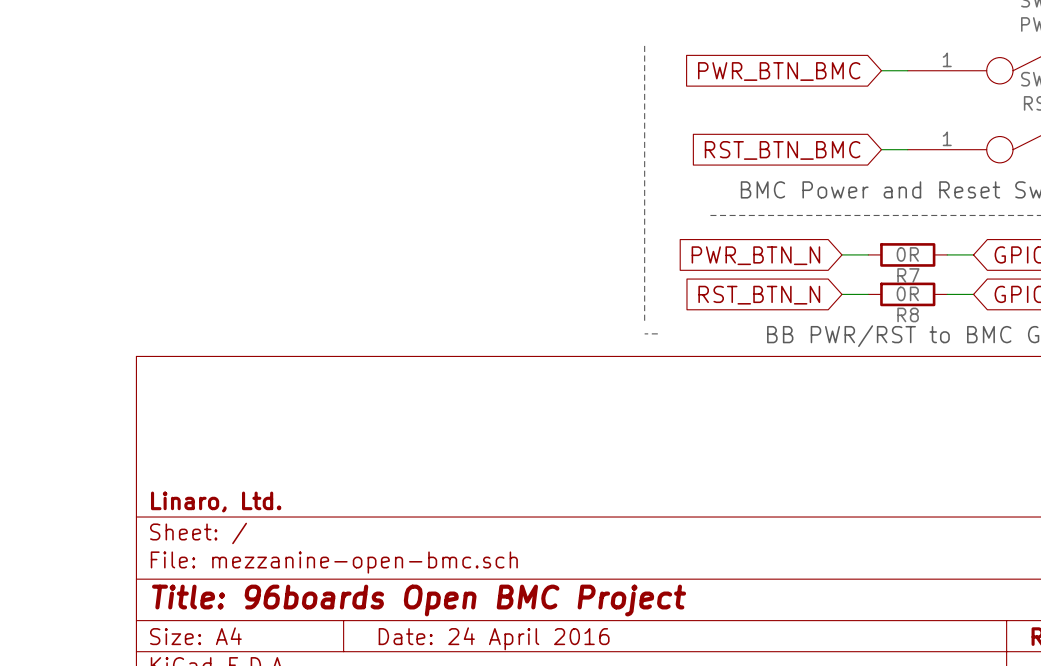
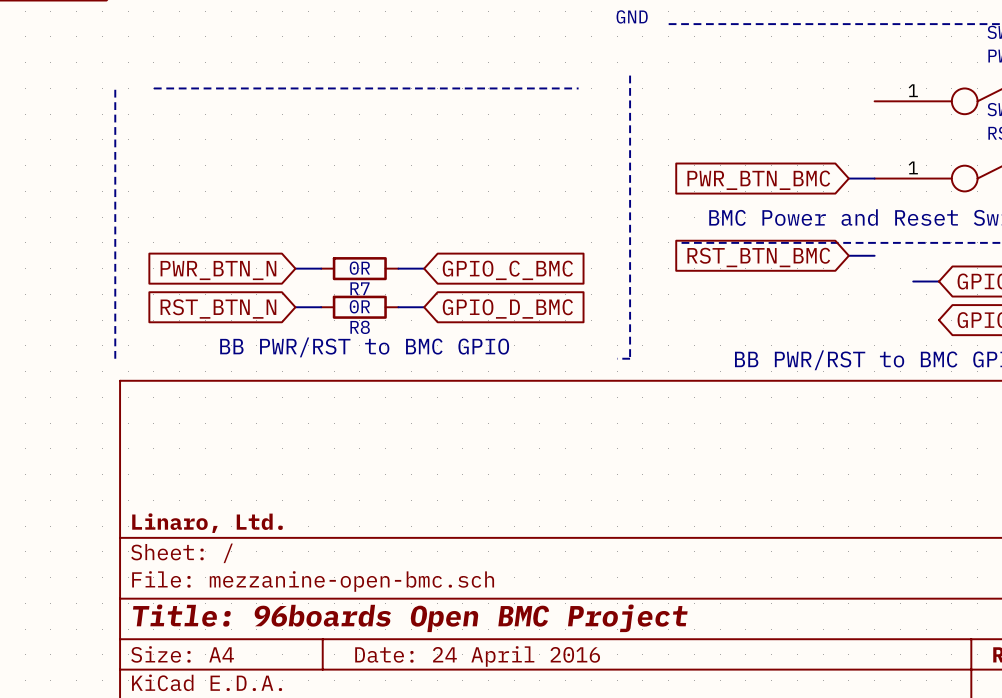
line: (644, 44) (644, 320) -> none
line: none -> (630, 75) (630, 358)
line: none -> (115, 88) (115, 358)
line: none -> (153, 88) (578, 88)
wire: (881, 70) (907, 70) -> none
global label: PWR_BTN_BMC (779, 71) -> none
global label: RST_BTN_BMC (782, 150) -> PWR_BTN_BMC (758, 180)
global label: none -> RST_BTN_BMC (758, 257)
wire: none -> (295, 268) (321, 268)
wire: none -> (398, 268) (424, 268)
global label: none -> PWR_BTN_N (218, 270)
global label: none -> GPIO_C_BMC (507, 270)
wire: (841, 254) (868, 254) -> (848, 255) (874, 255)
R7 position: (907, 254) -> (359, 268)
global label: PWR_BTN_N (755, 255) -> none
wire: none -> (295, 307) (321, 307)
wire: none -> (398, 307) (424, 307)
global label: none -> RST_BTN_N (218, 308)
global label: none -> GPIO_D_BMC (507, 308)
wire: (841, 294) (868, 294) -> none
R8 position: (907, 294) -> (359, 307)
wire: (947, 294) (973, 294) -> none
global label: RST_BTN_N (759, 295) -> none
text: none -> BB PWR/RST to BMC GPIO (364, 347)

